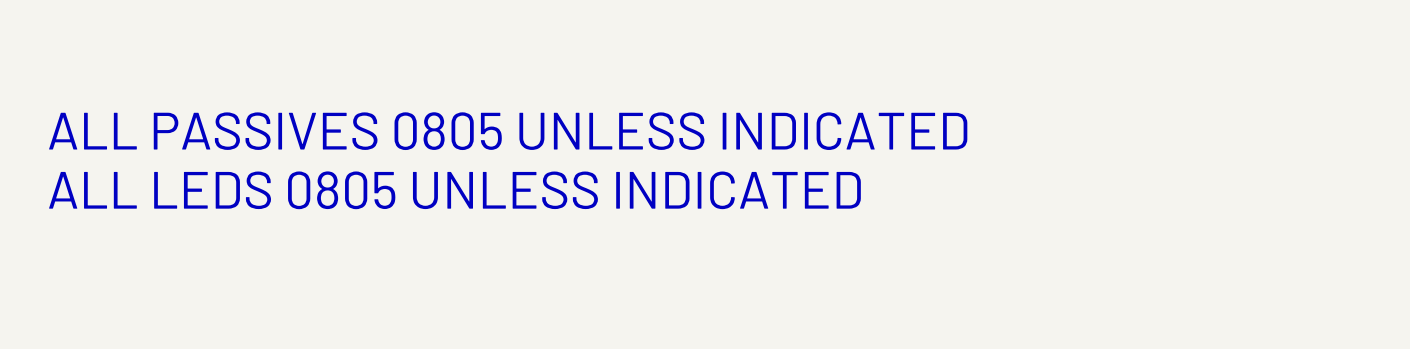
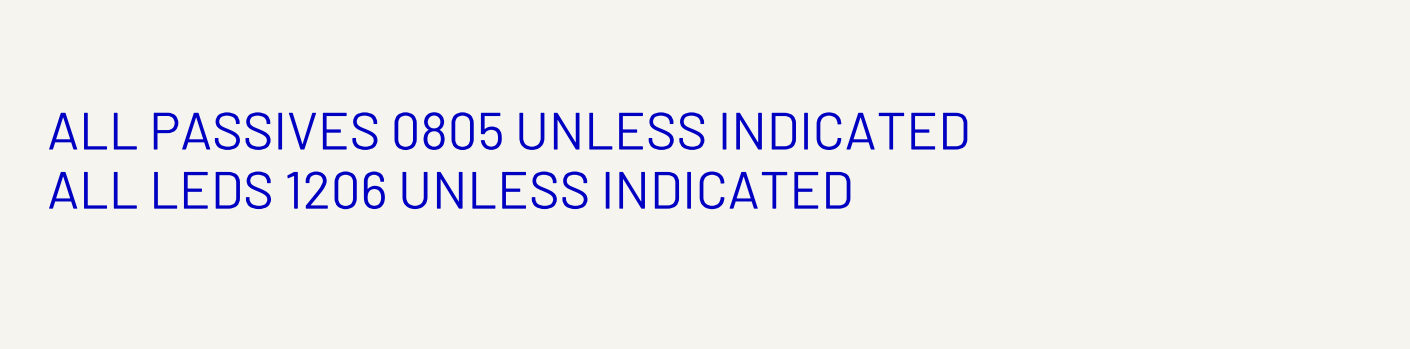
text: ALL LEDS 0805 UNLESS INDICATED (454, 190) -> ALL LEDS 1206 UNLESS INDICATED (449, 190)

